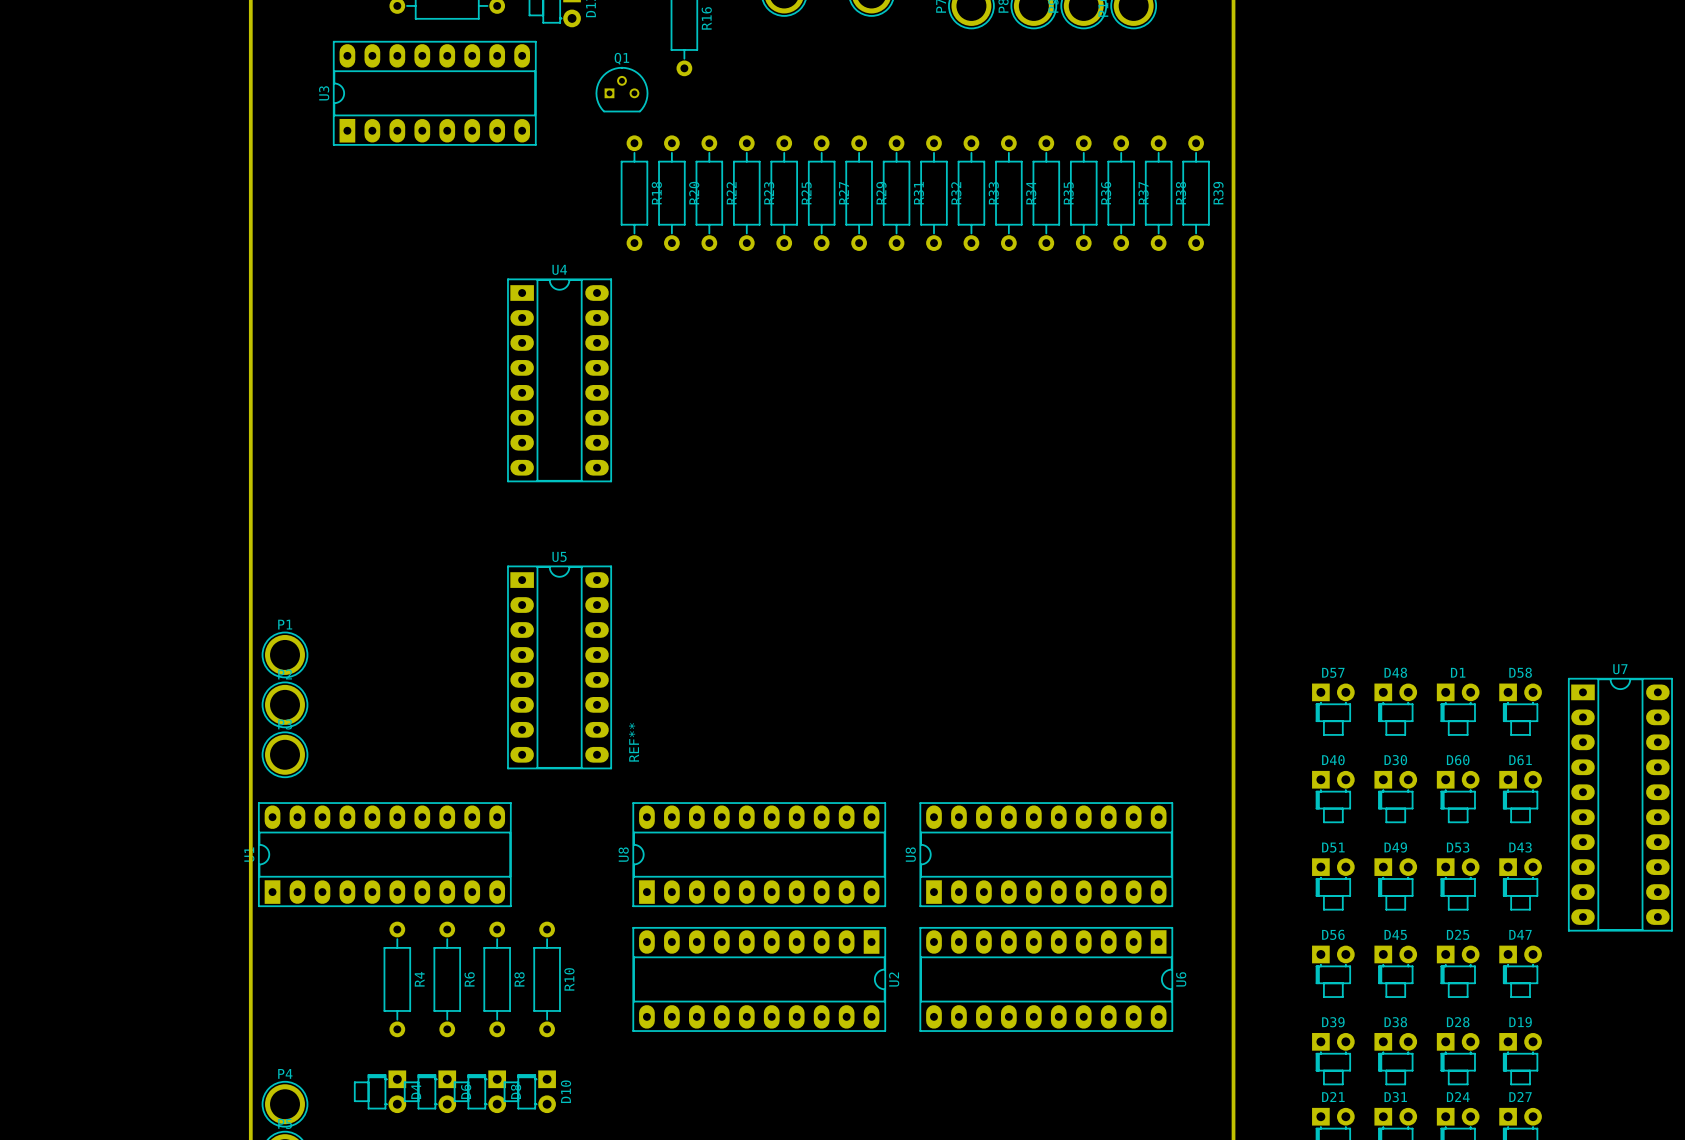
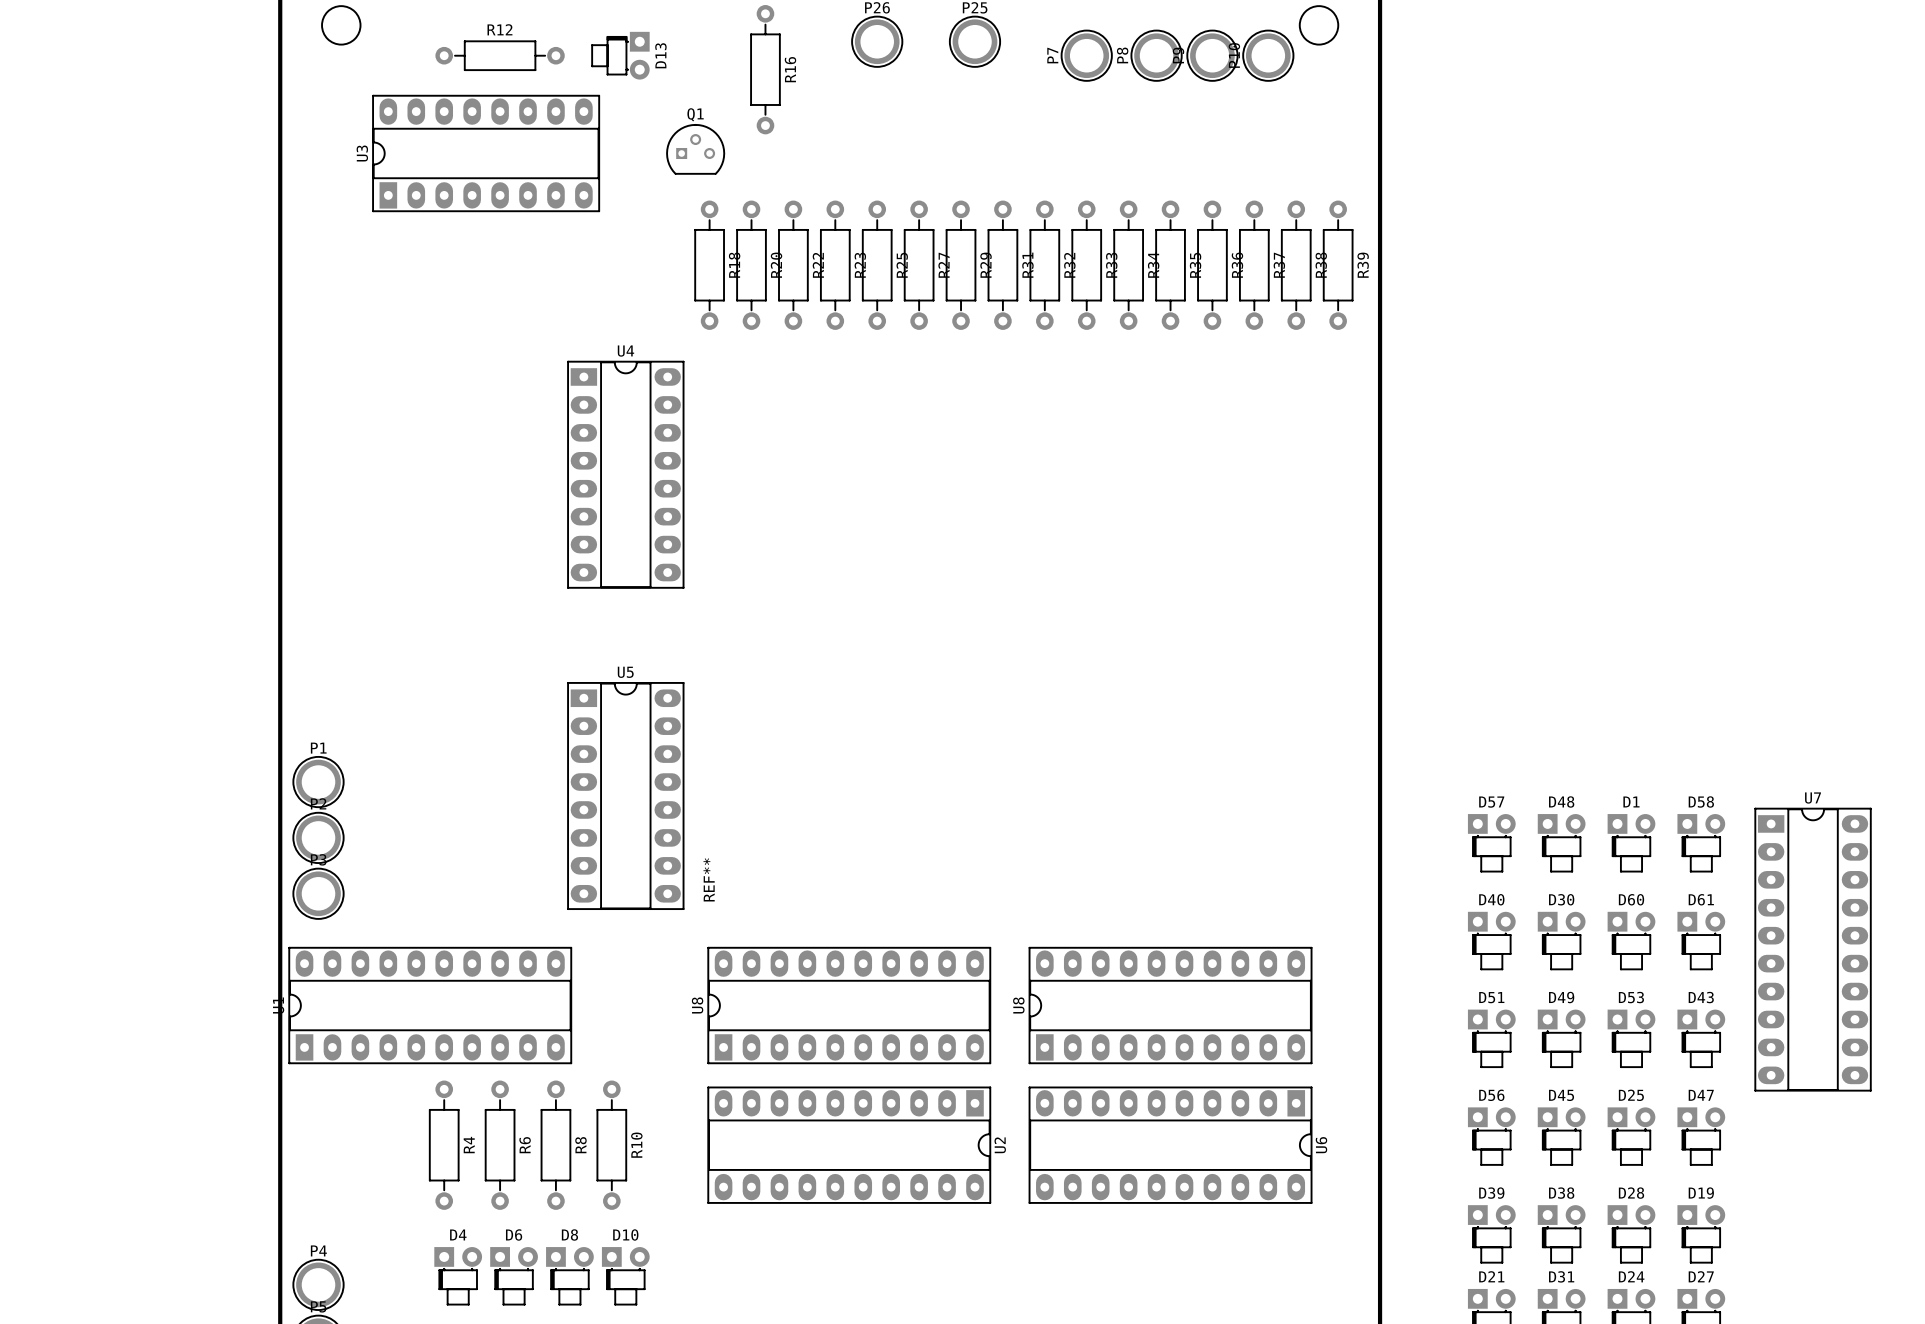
D4 rotation: 0° (380, 1091) -> 90° counterclockwise (458, 1276)
D6 rotation: 0° (430, 1091) -> 90° counterclockwise (514, 1276)
D8 rotation: 0° (480, 1091) -> 90° counterclockwise (569, 1276)
D10 rotation: 0° (529, 1091) -> 90° counterclockwise (625, 1276)

